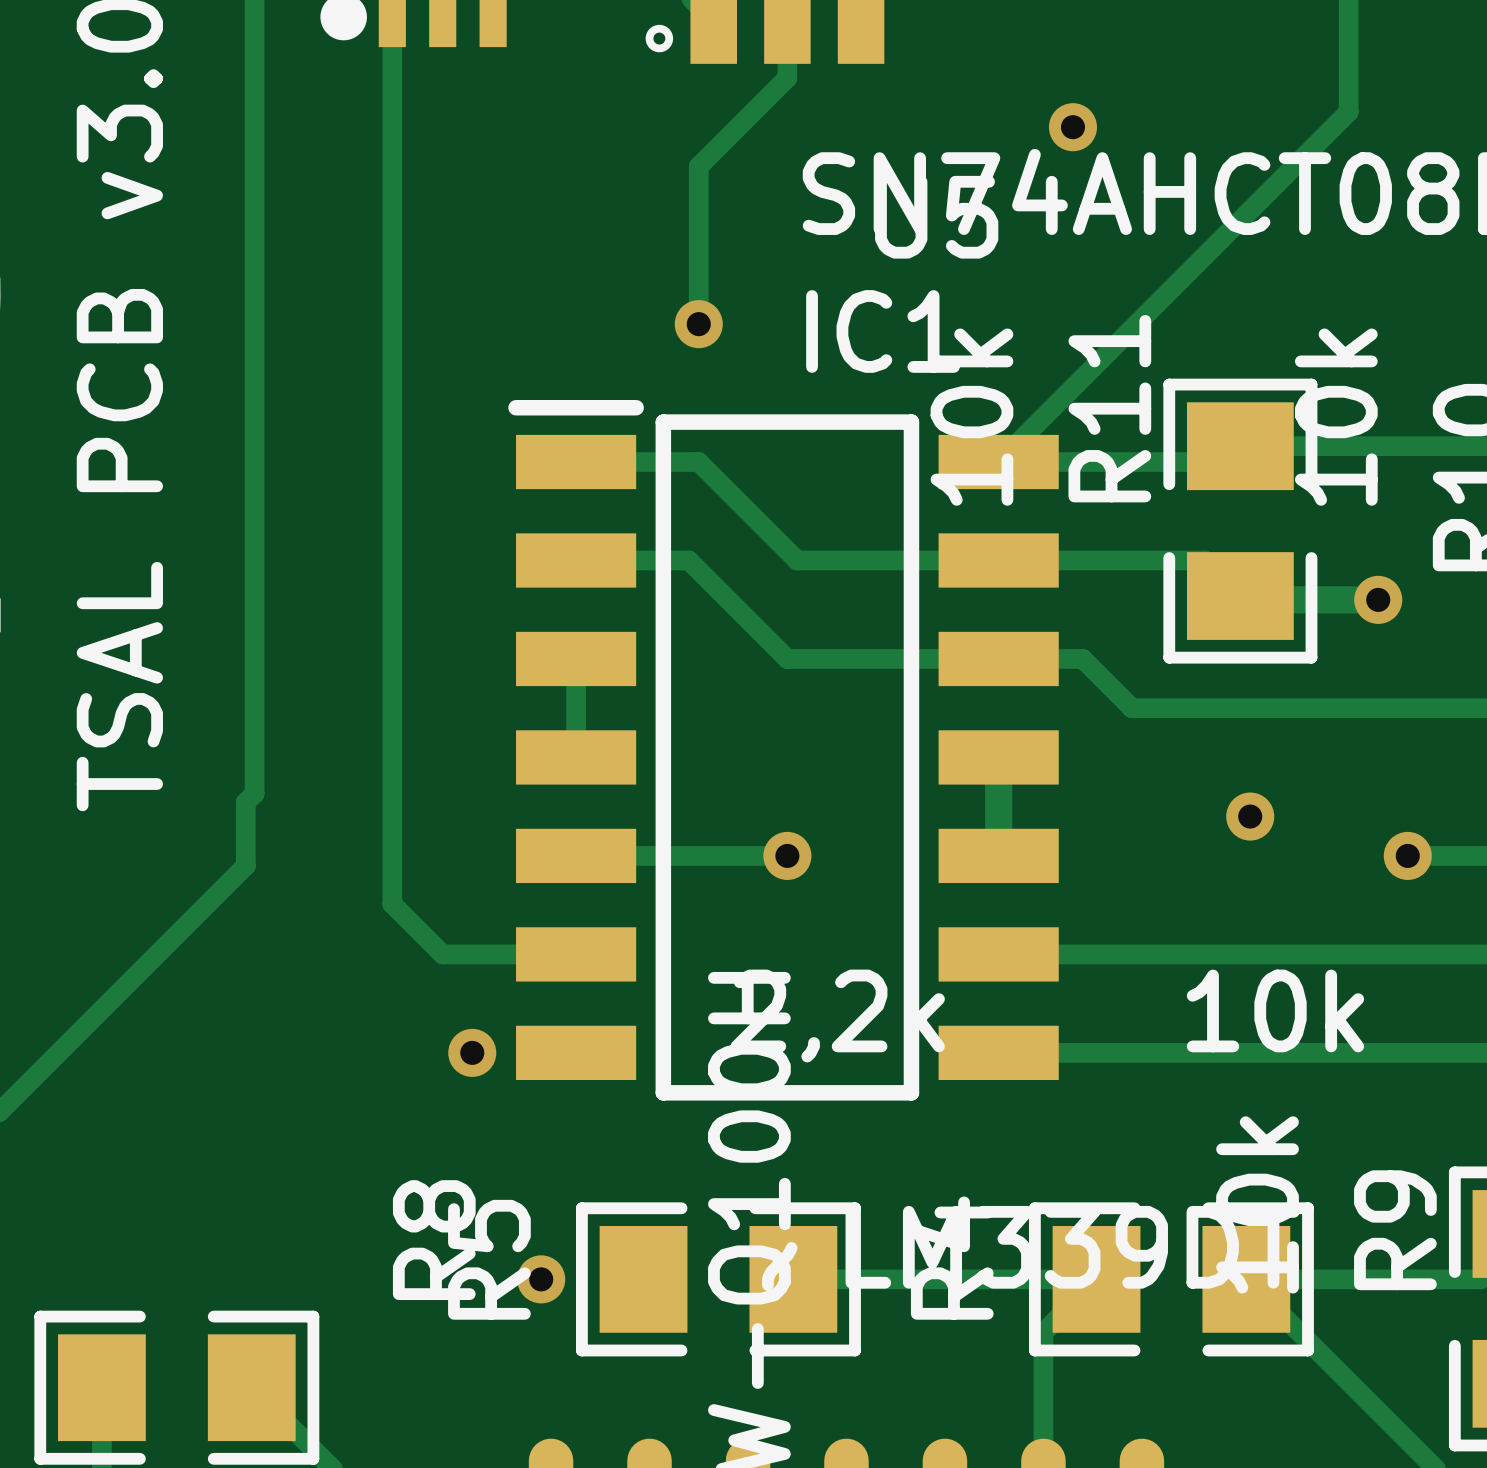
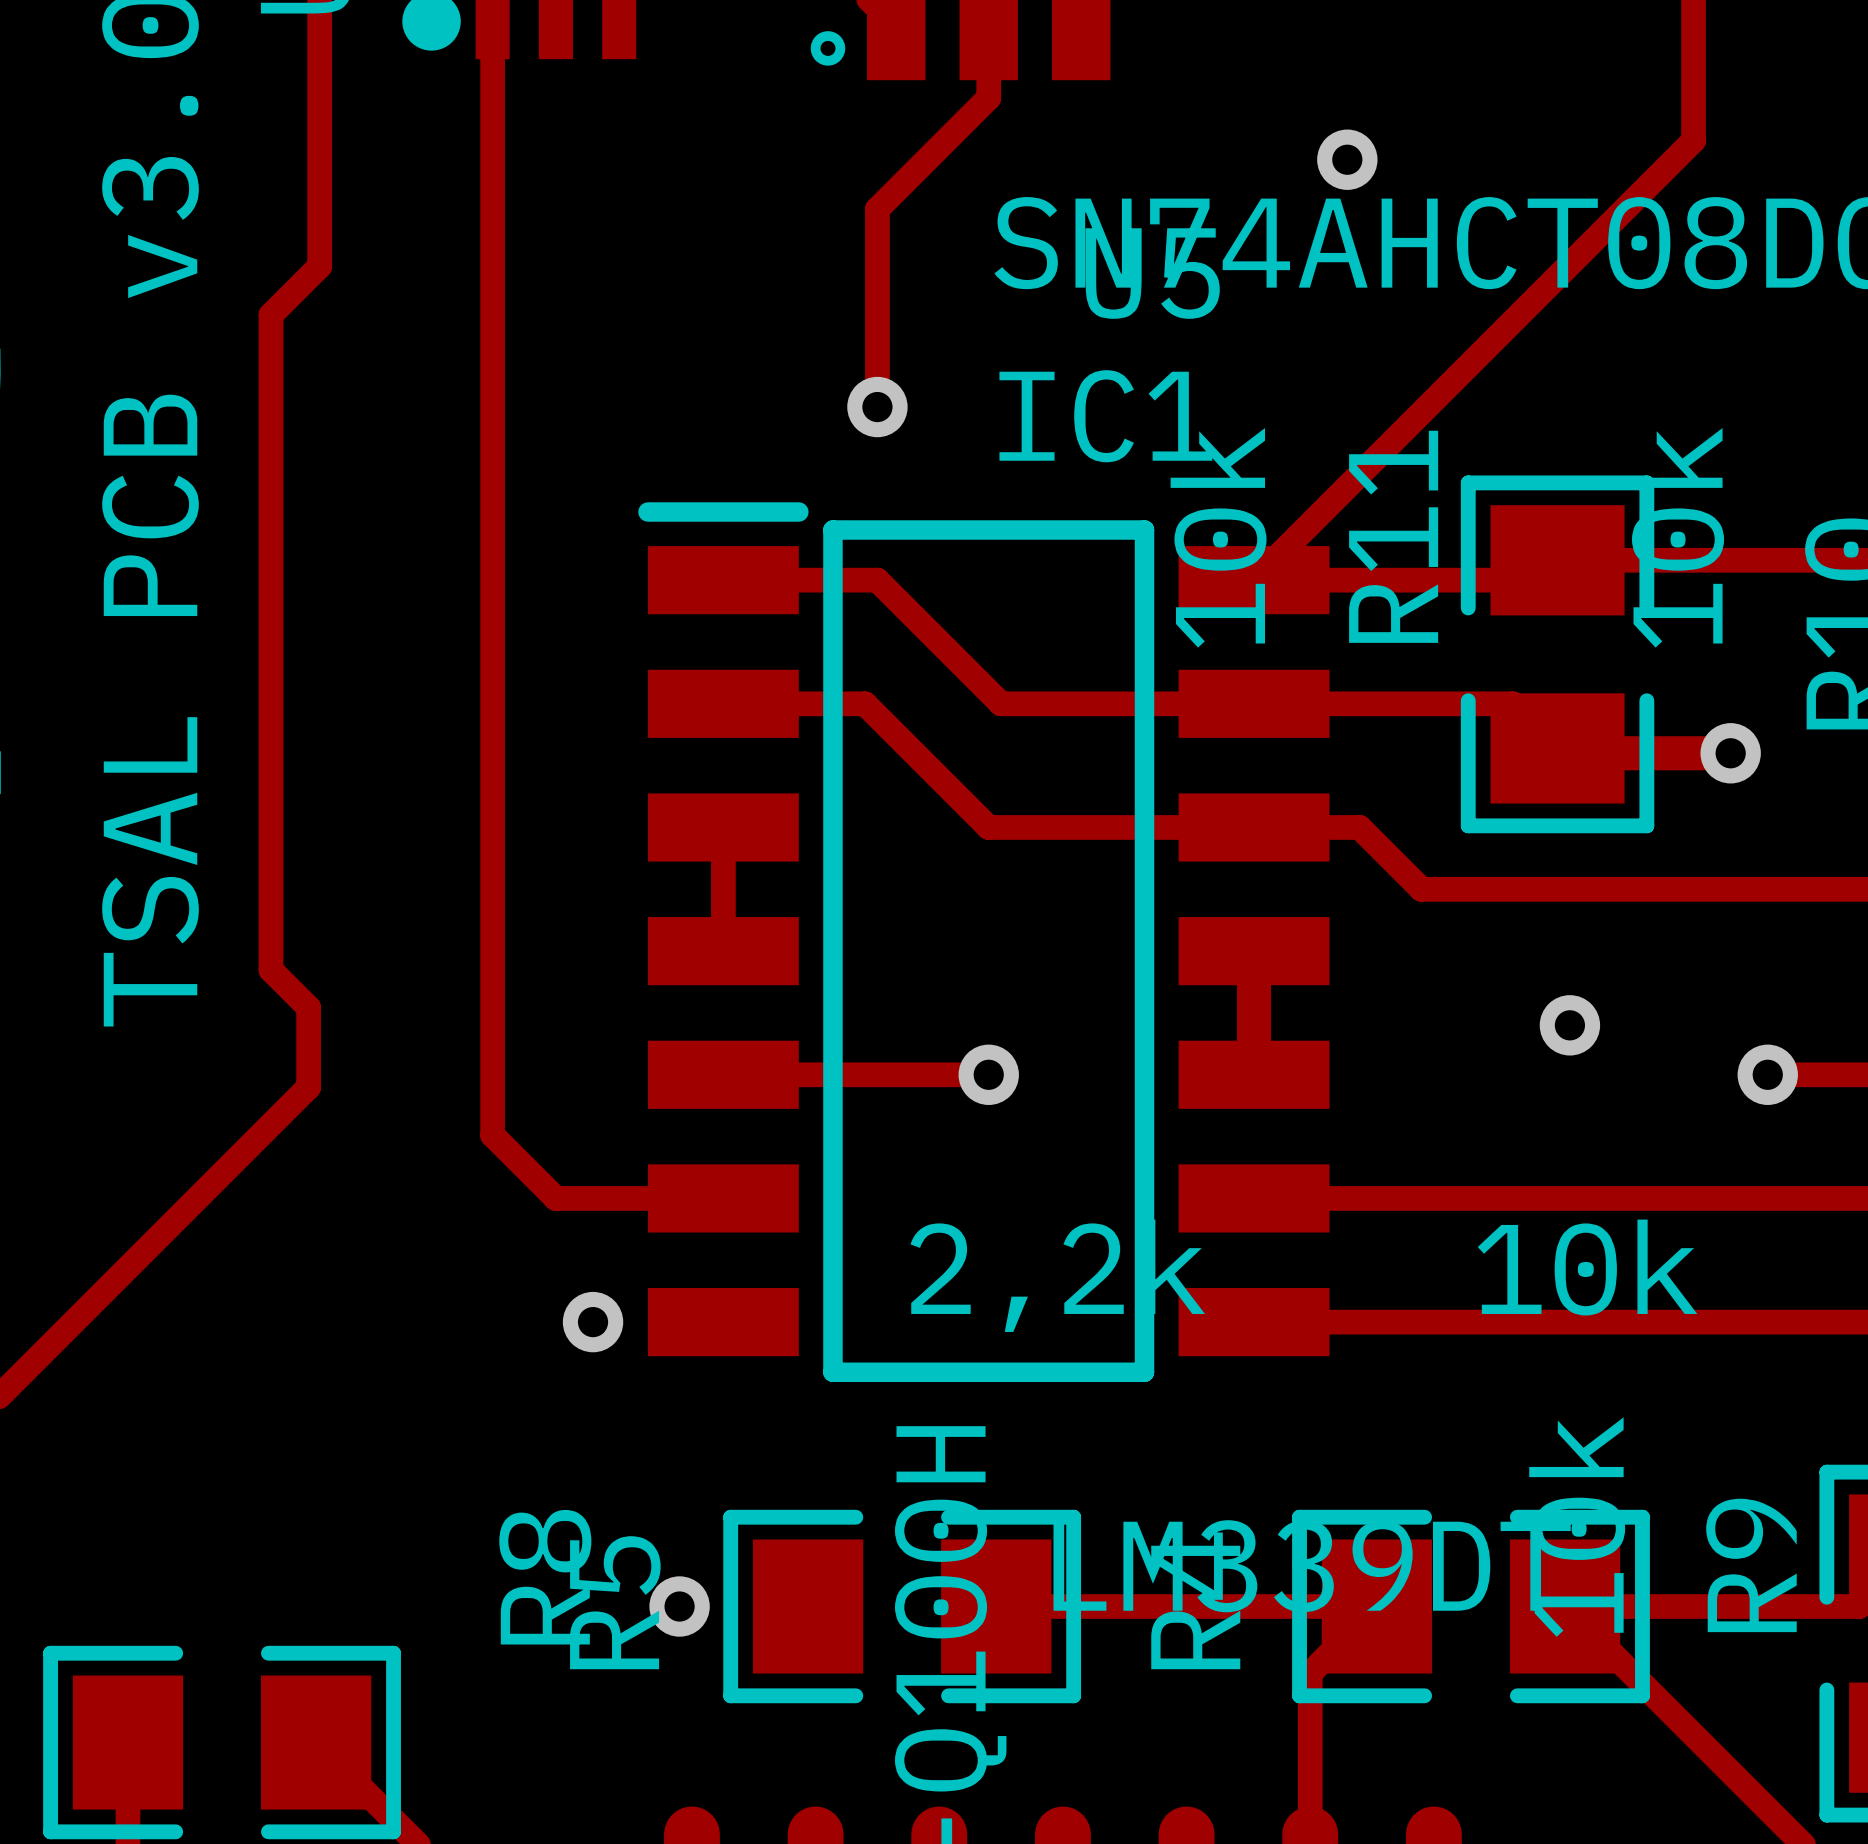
track: (254, 212) (254, 793) (245, 802) -> (319, 266) (271, 314) (271, 970) (308, 1007)

